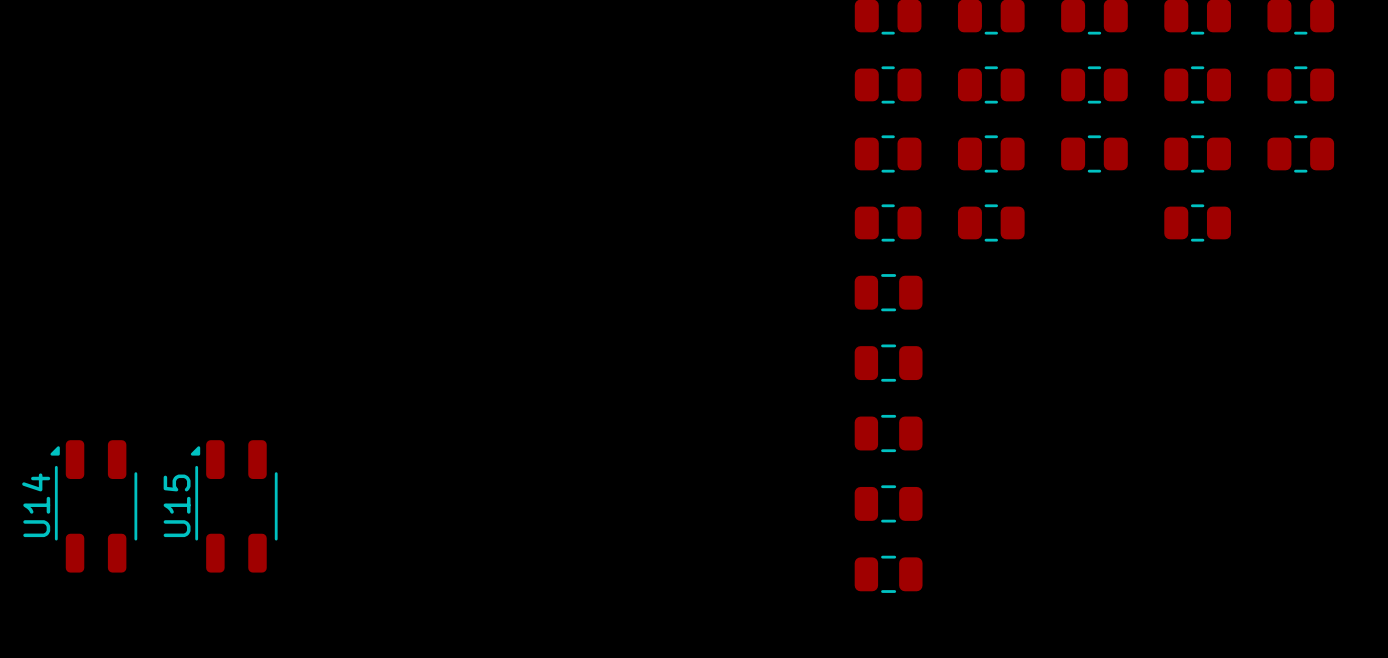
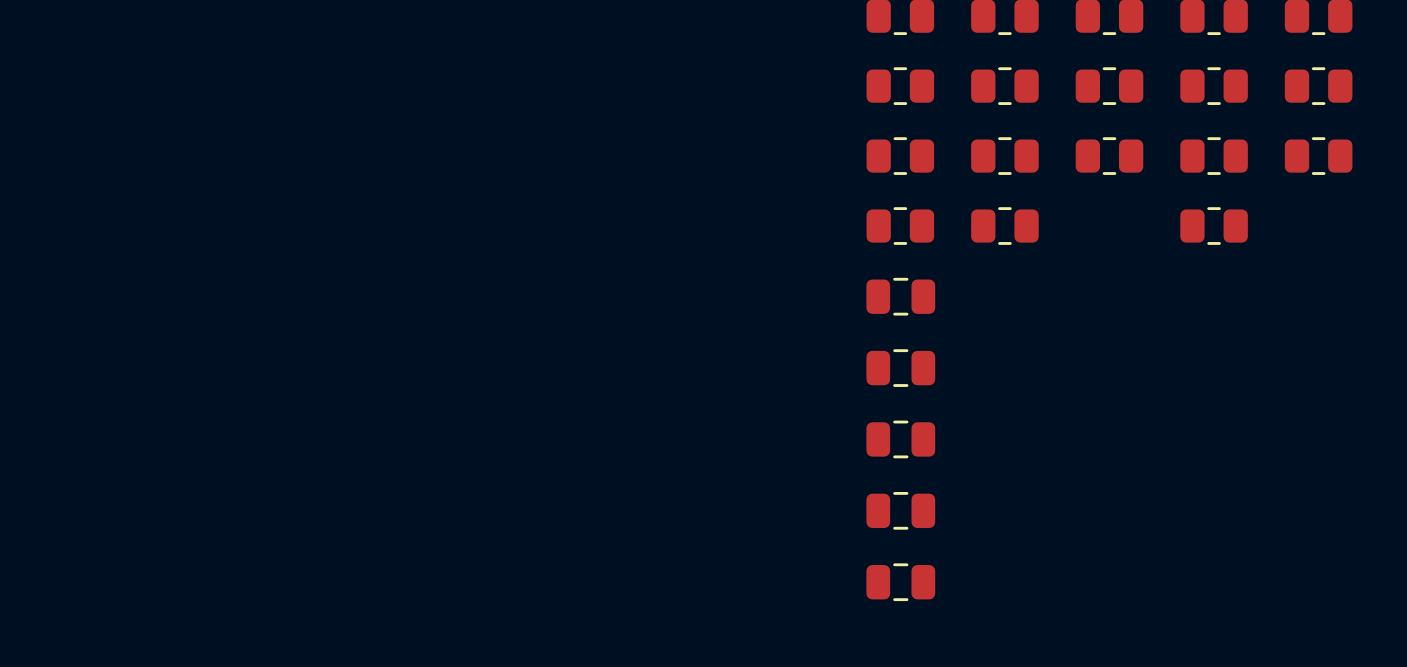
U14: (93, 506) -> none
U15: (234, 506) -> none

